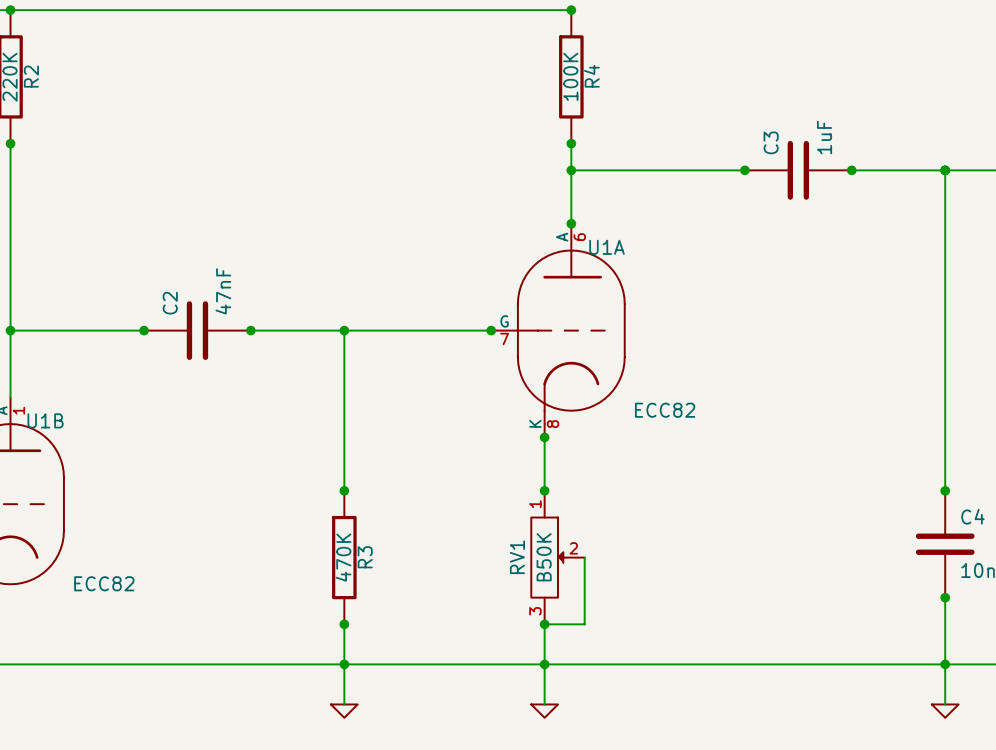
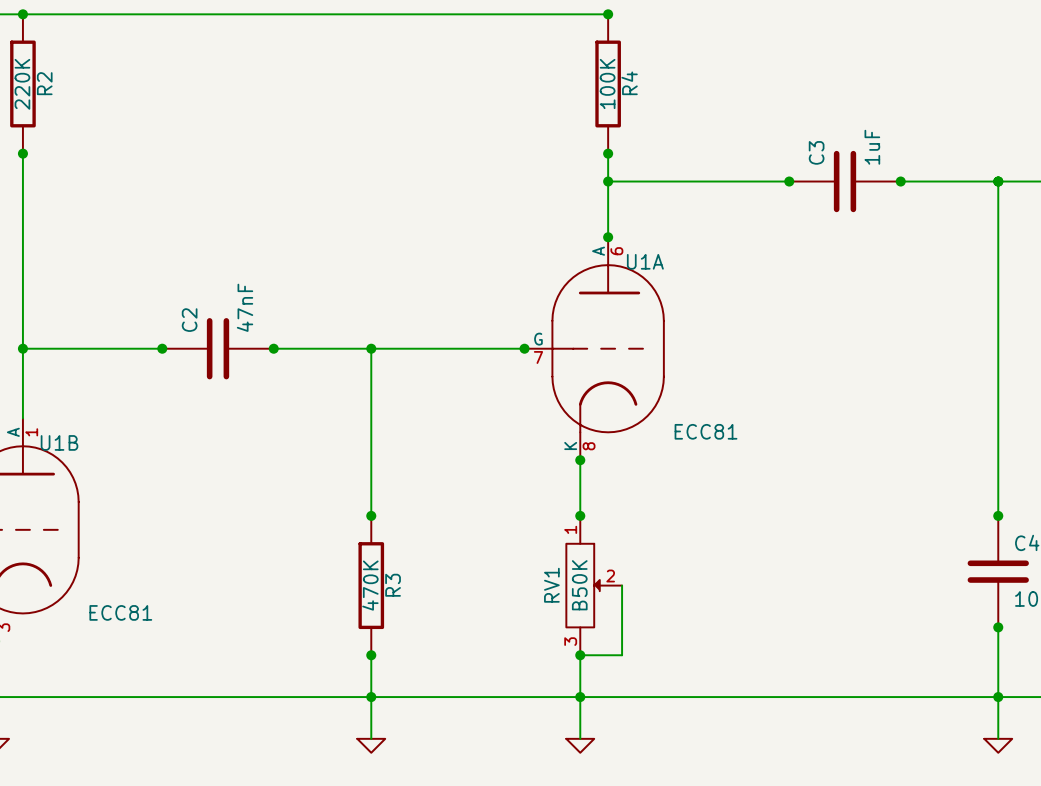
U1A value: ECC82 (665, 410) -> ECC81 (706, 431)
U1B value: ECC82 (104, 583) -> ECC81 (120, 612)

